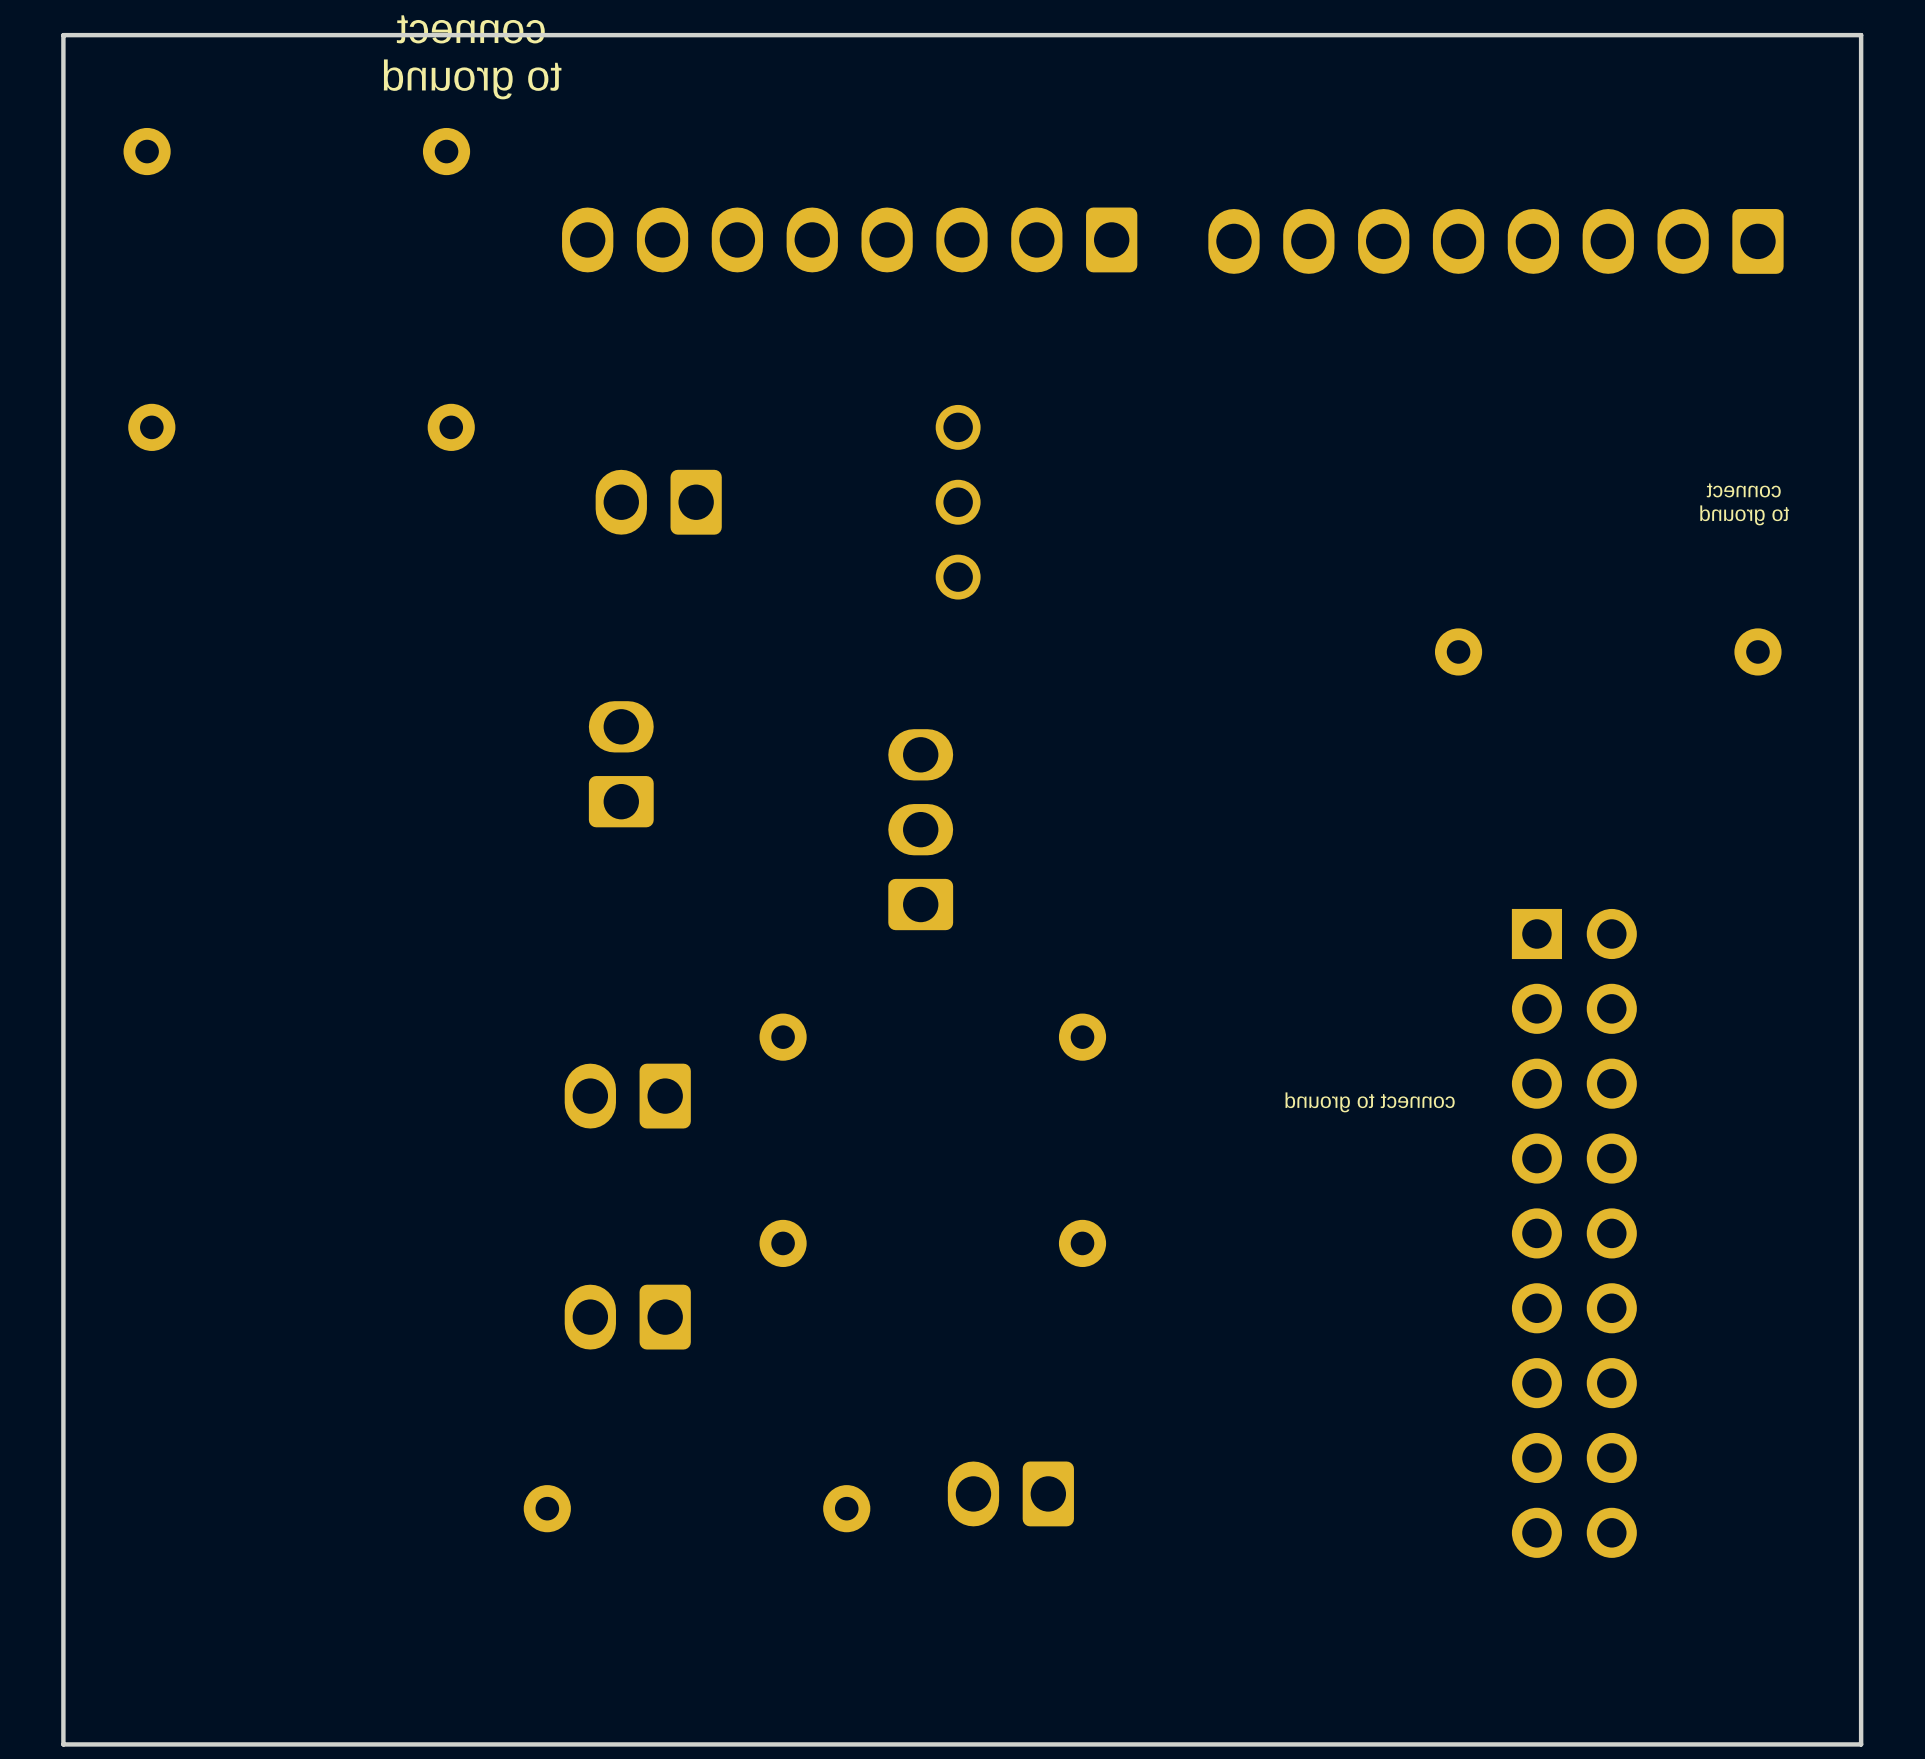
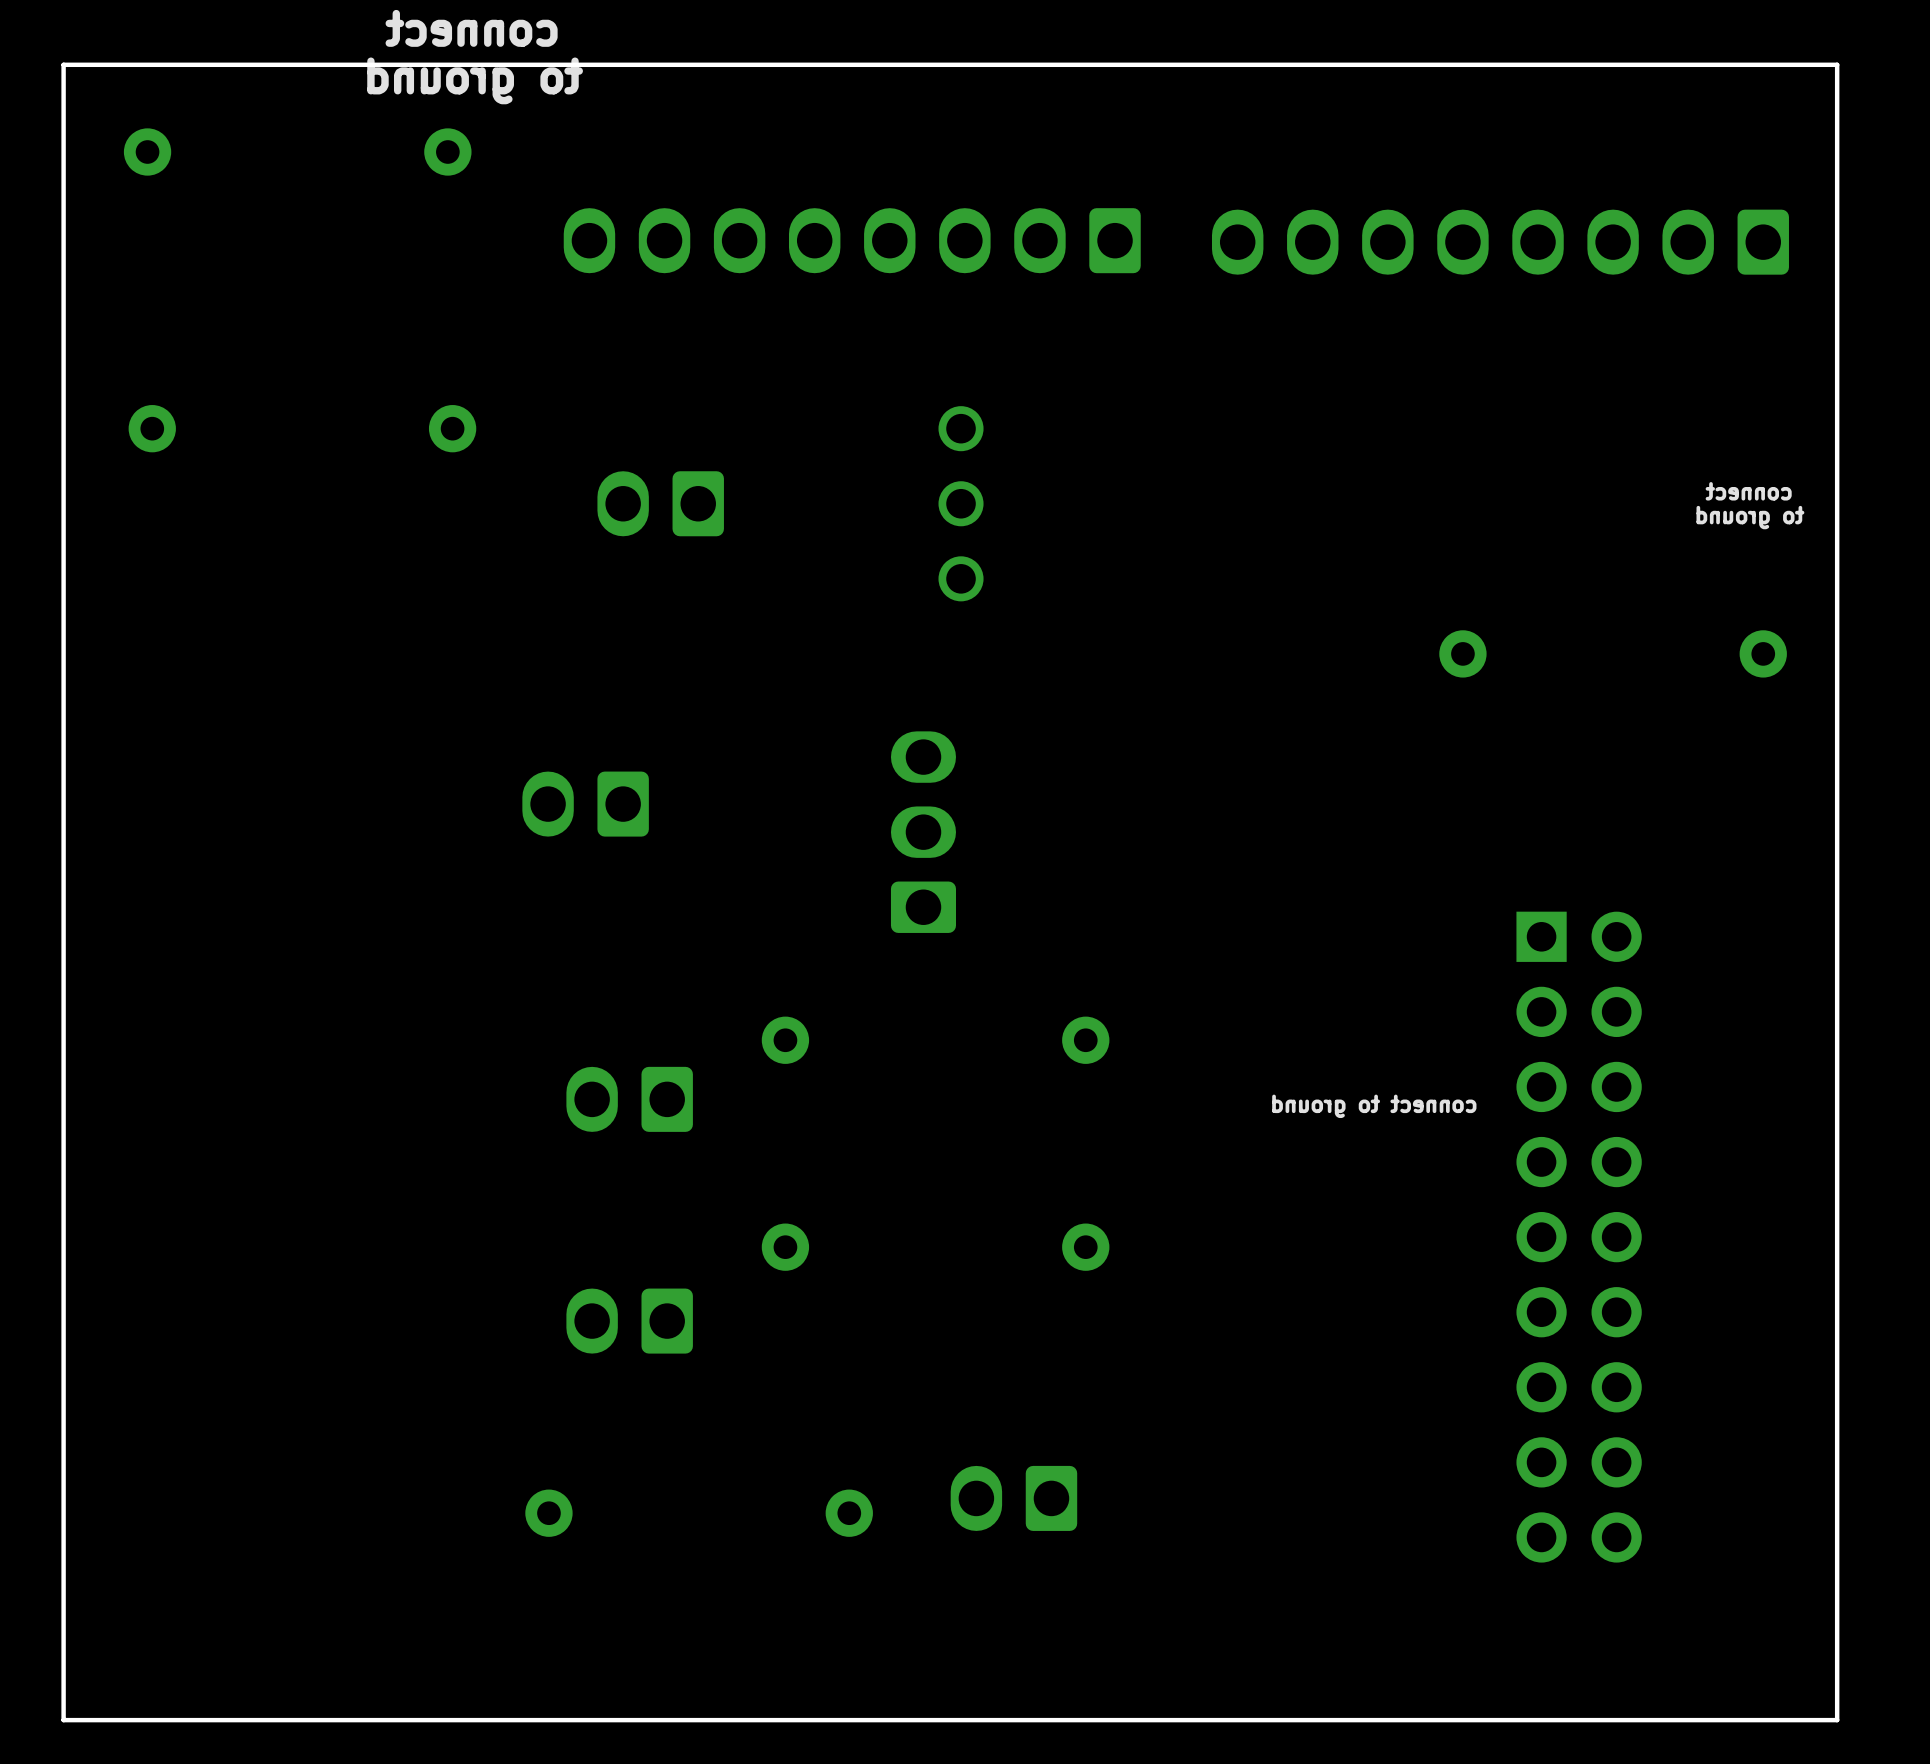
board edge: (63, 64) (63, 35) (1861, 35) (1861, 1744) (63, 1744) (63, 1714) -> (63, 64) (1837, 64) (1837, 1720) (63, 1720)
part rotation: 0° (621, 764) -> 90° counterclockwise (585, 804)

